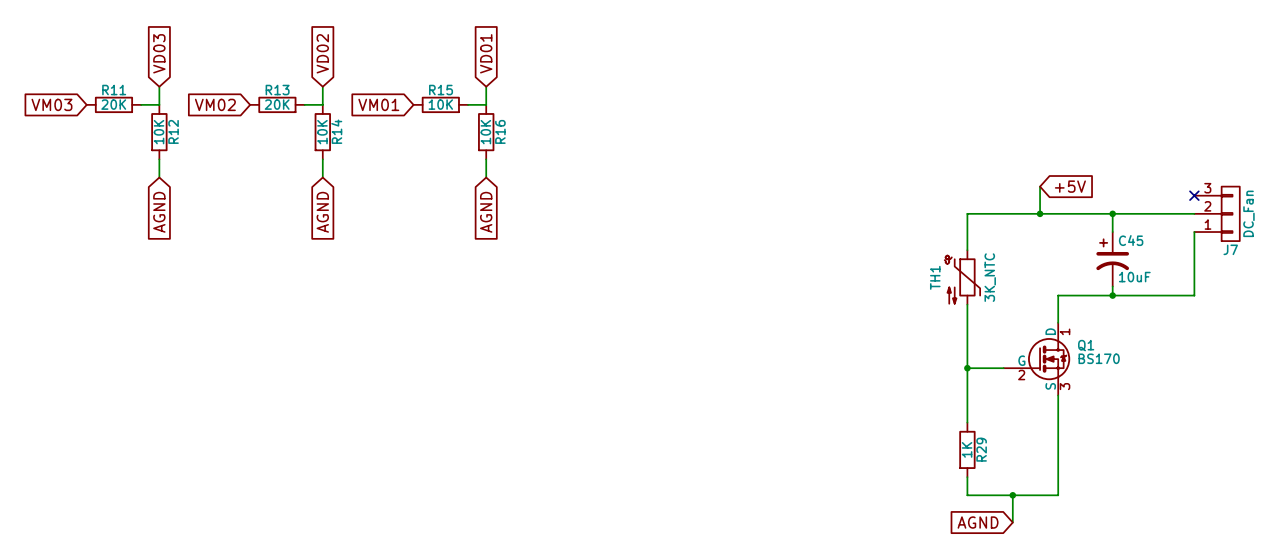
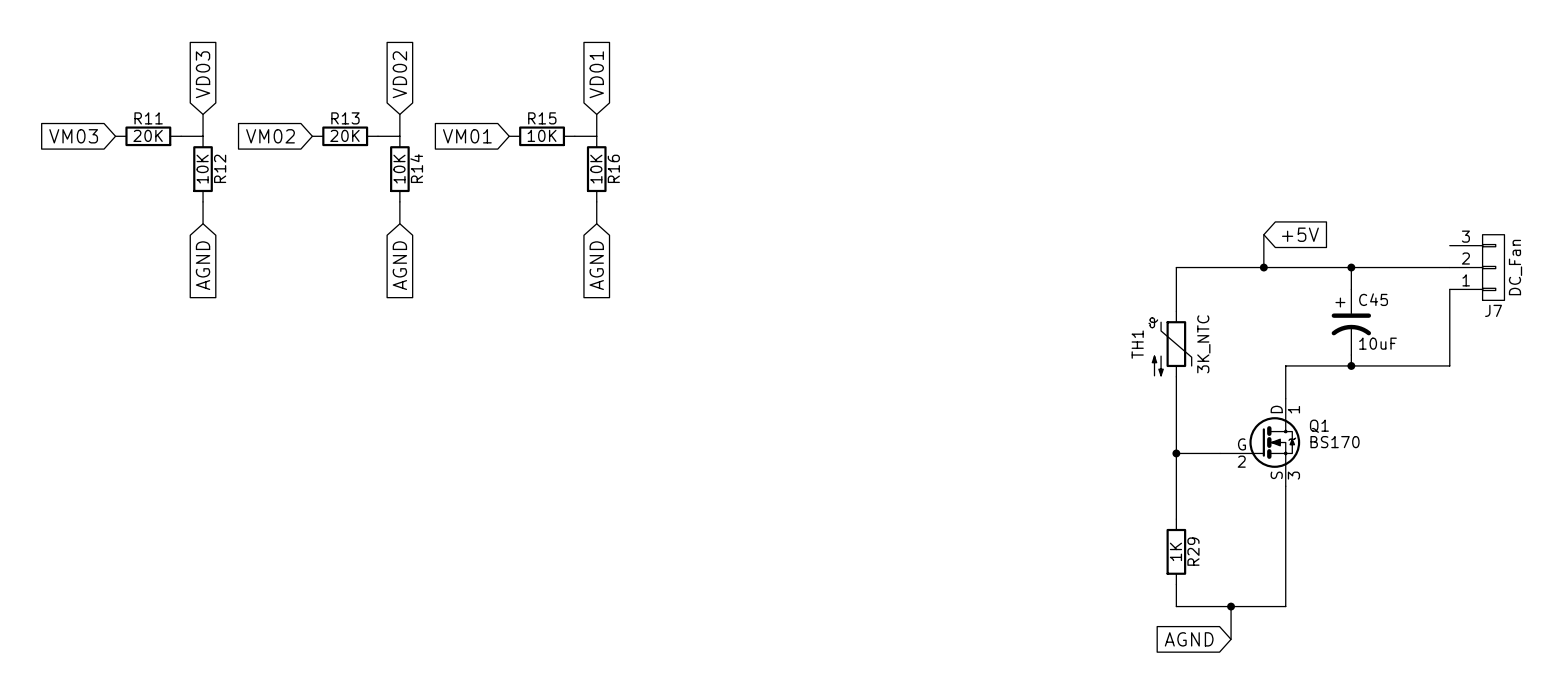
no-connect mark: (1194, 195) -> none

